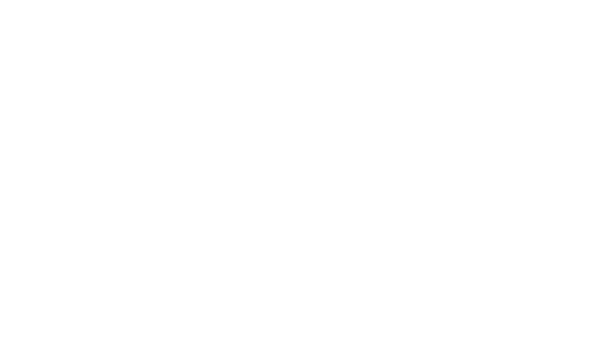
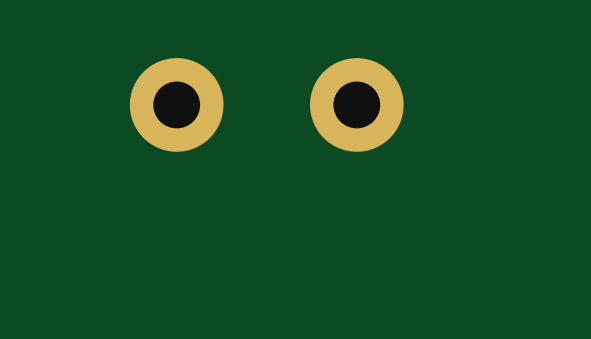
part: none -> (266, 104)

